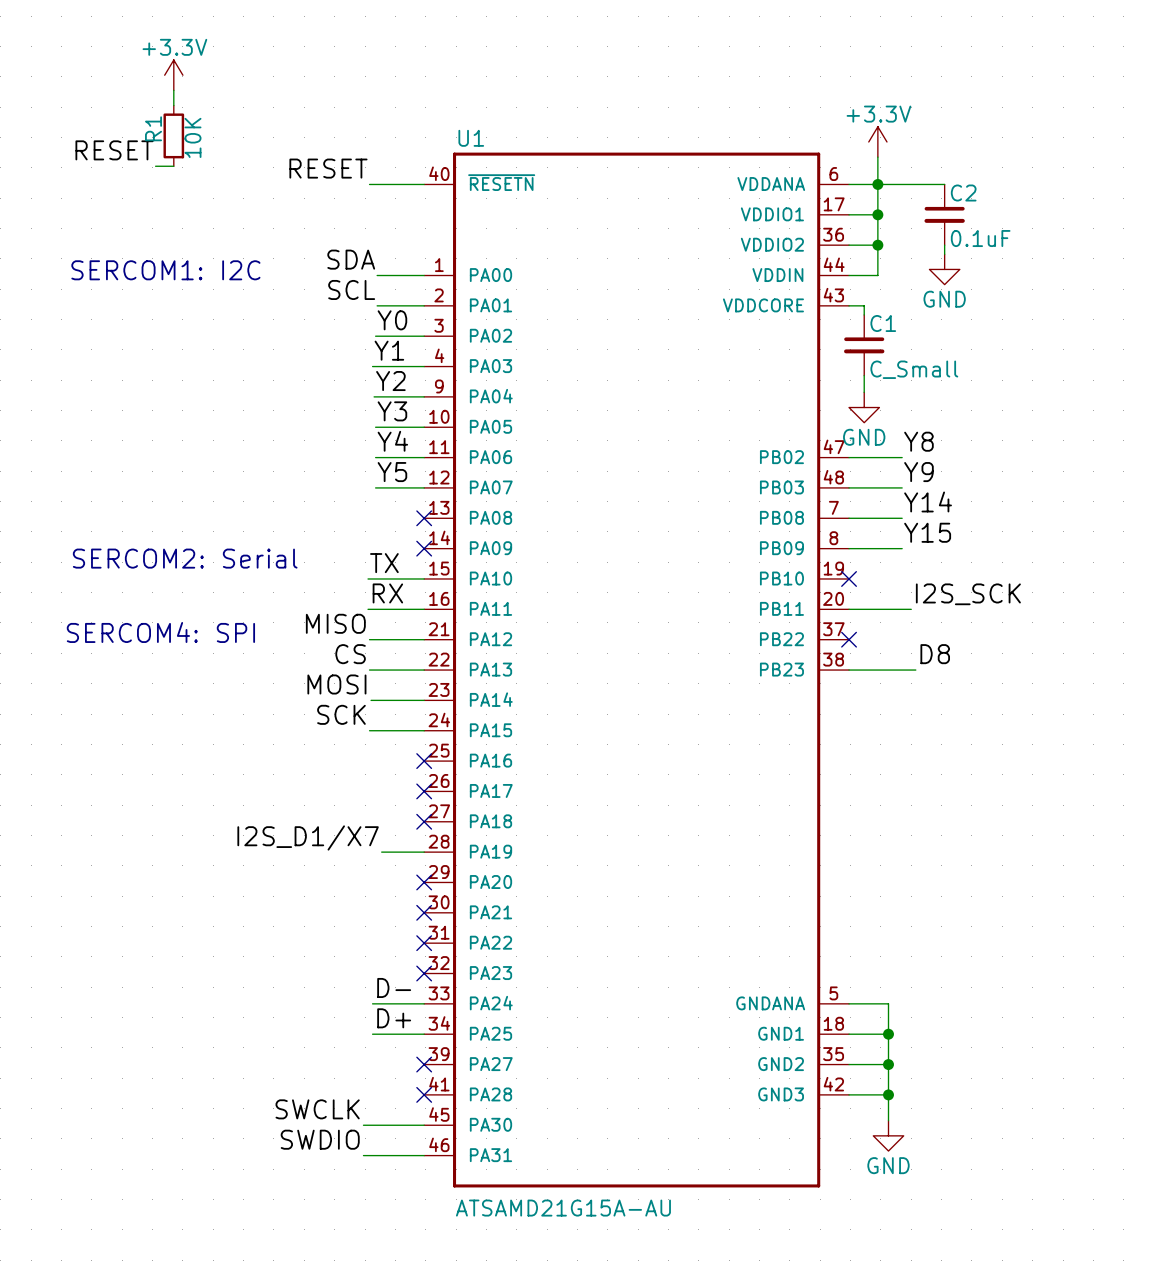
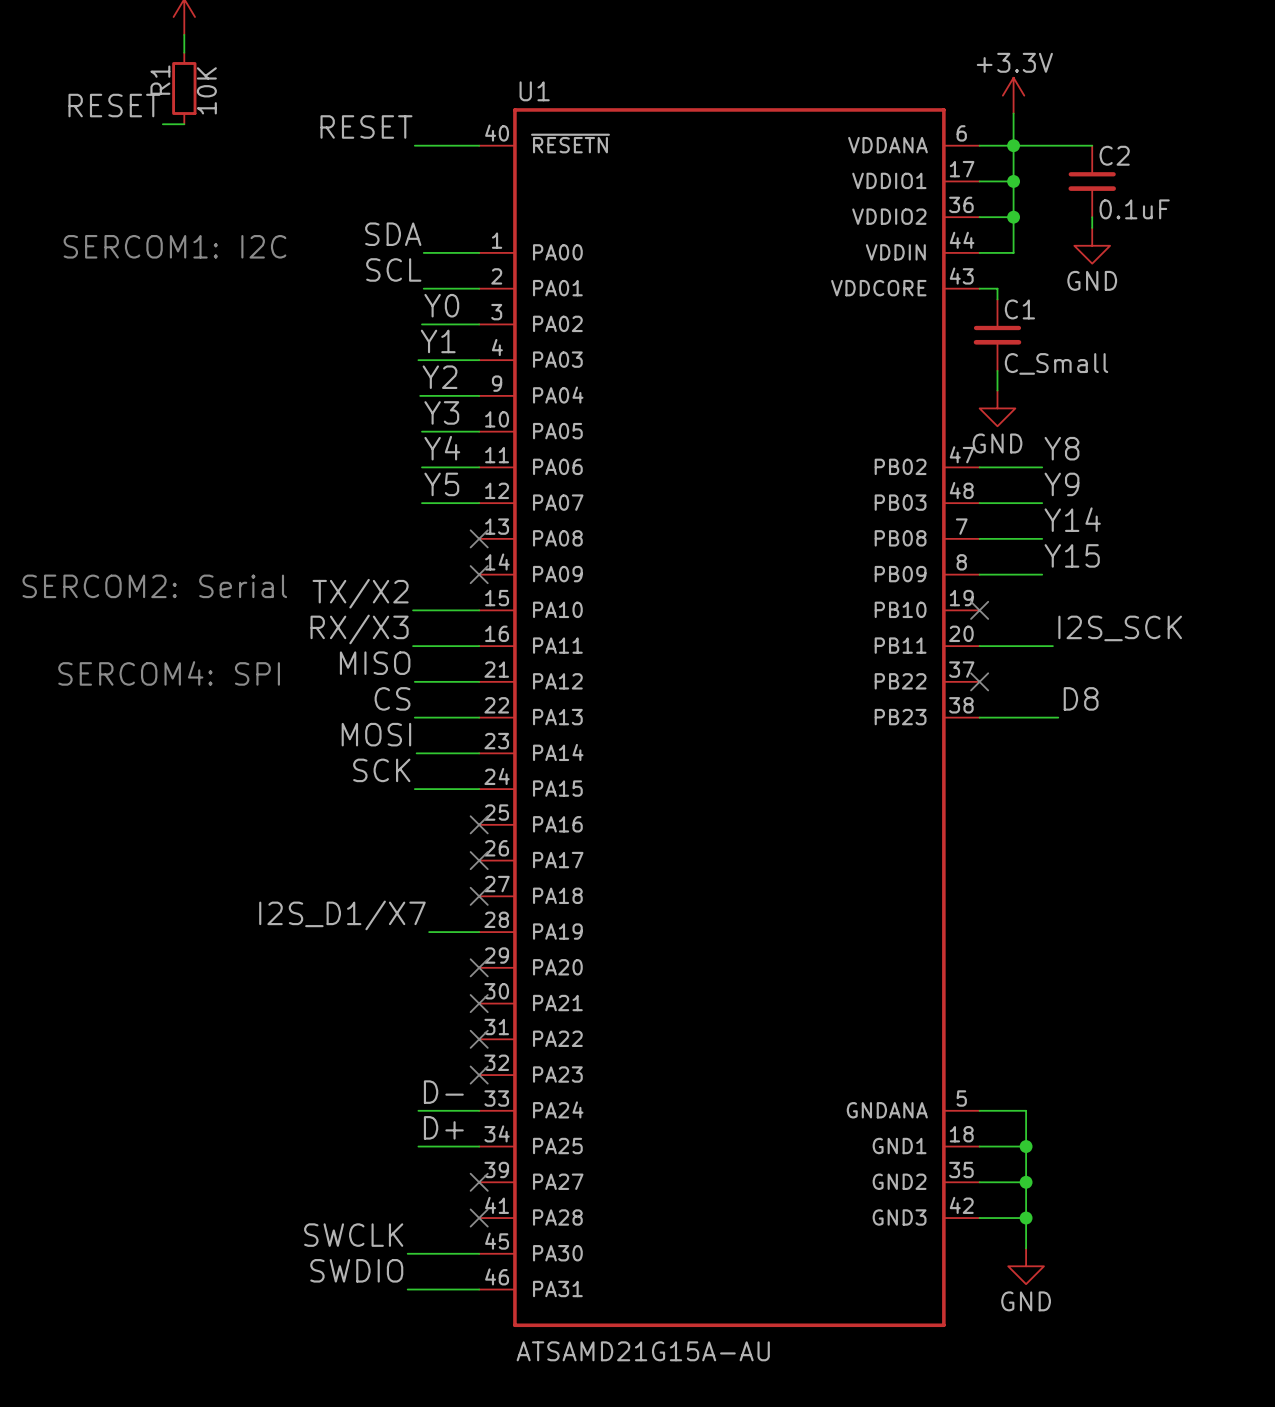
text position: SERCOM2: Serial (185, 558) -> SERCOM2: Serial (154, 586)
label: TX (384, 563) -> TX/X2 (360, 593)
label: RX (387, 593) -> RX/X3 (359, 629)

